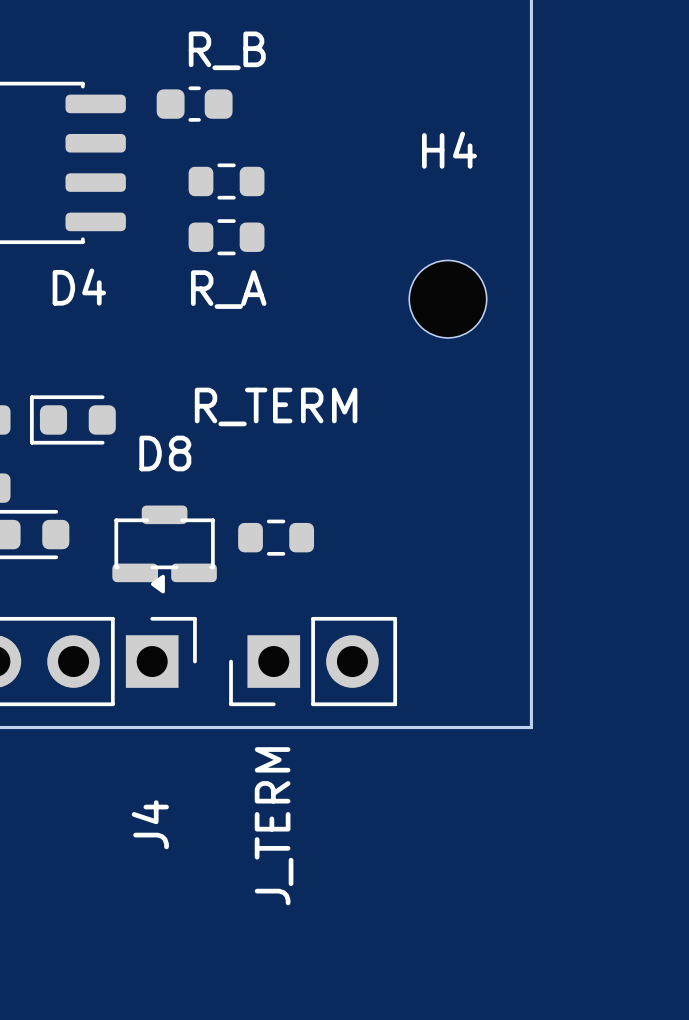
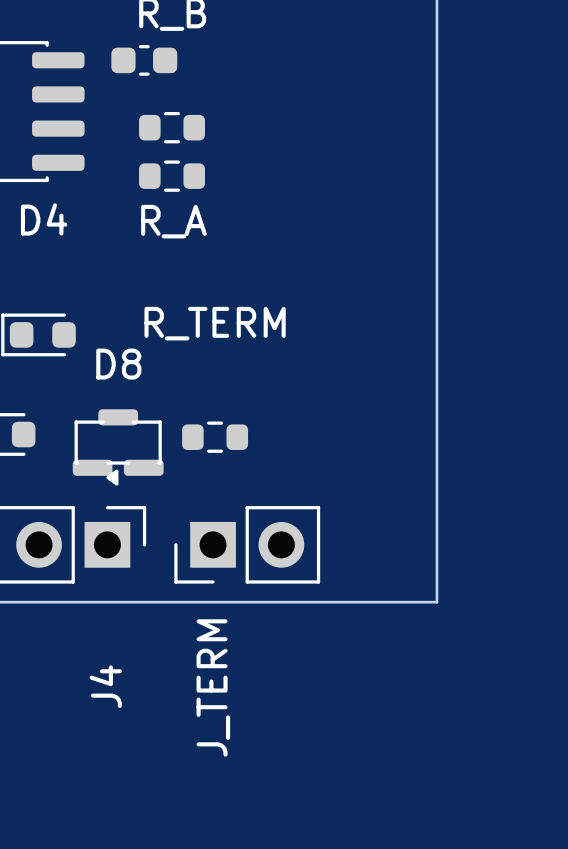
H4: (447, 299) -> none

